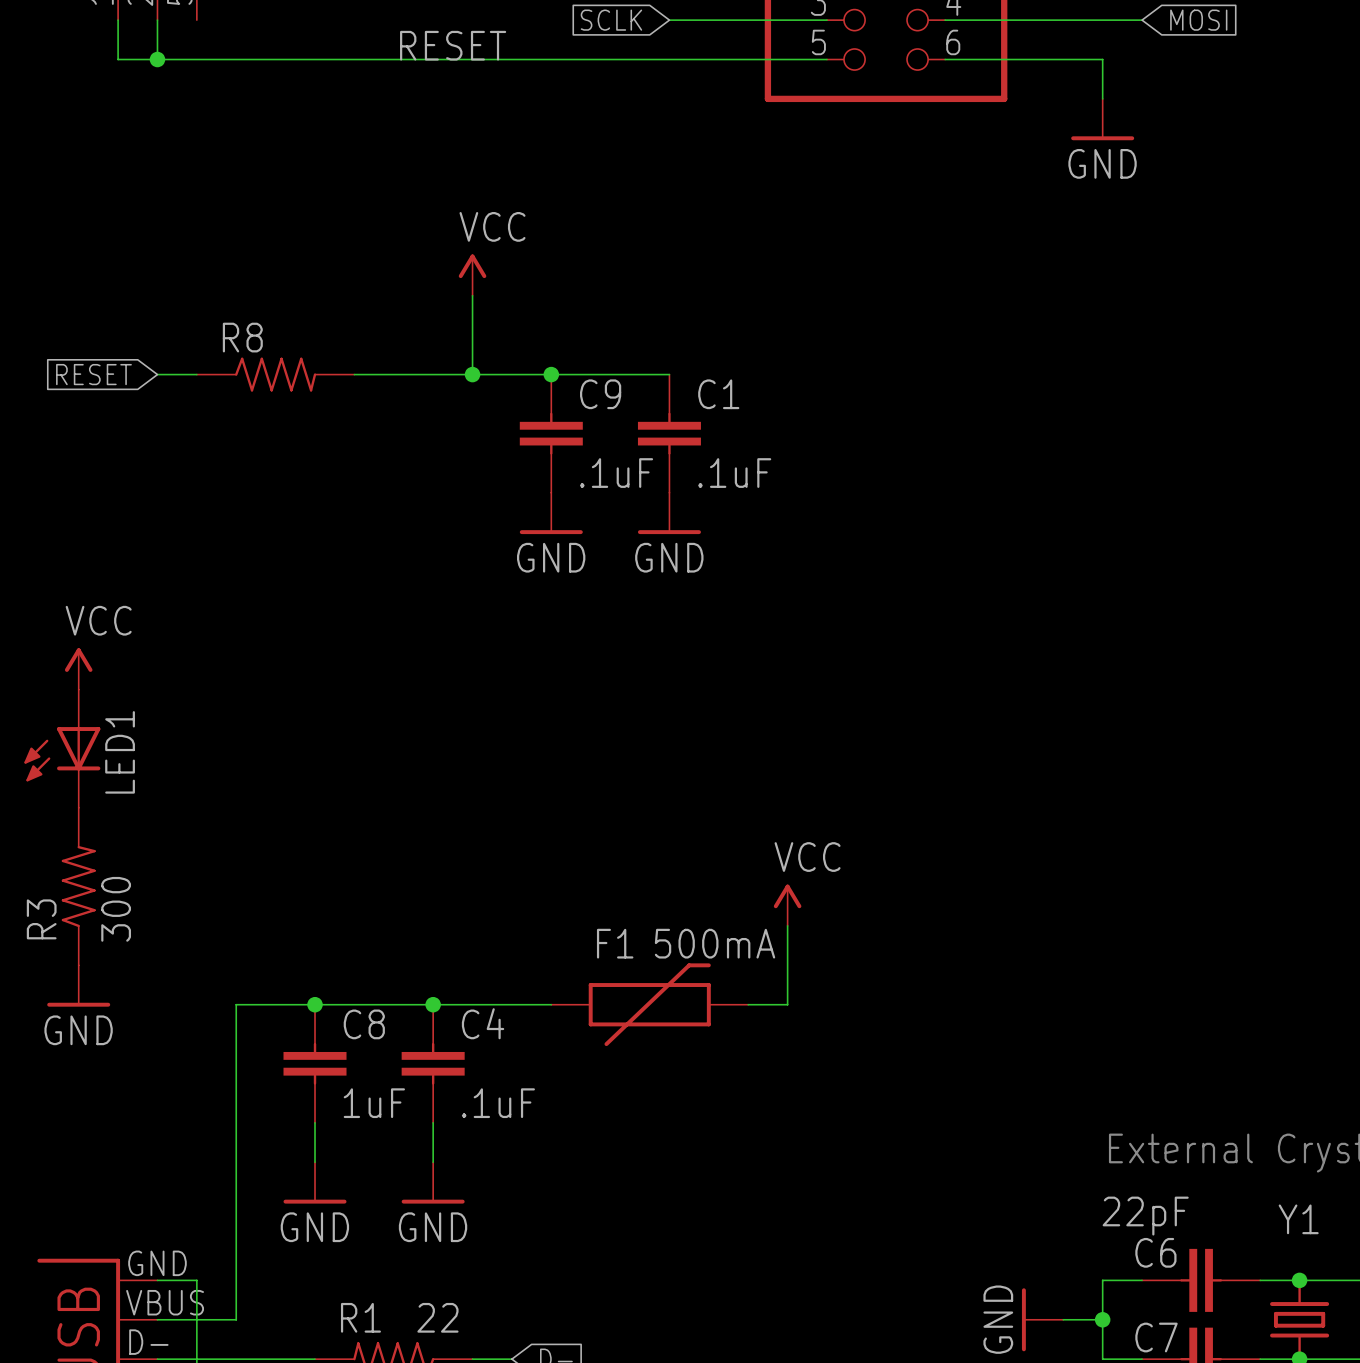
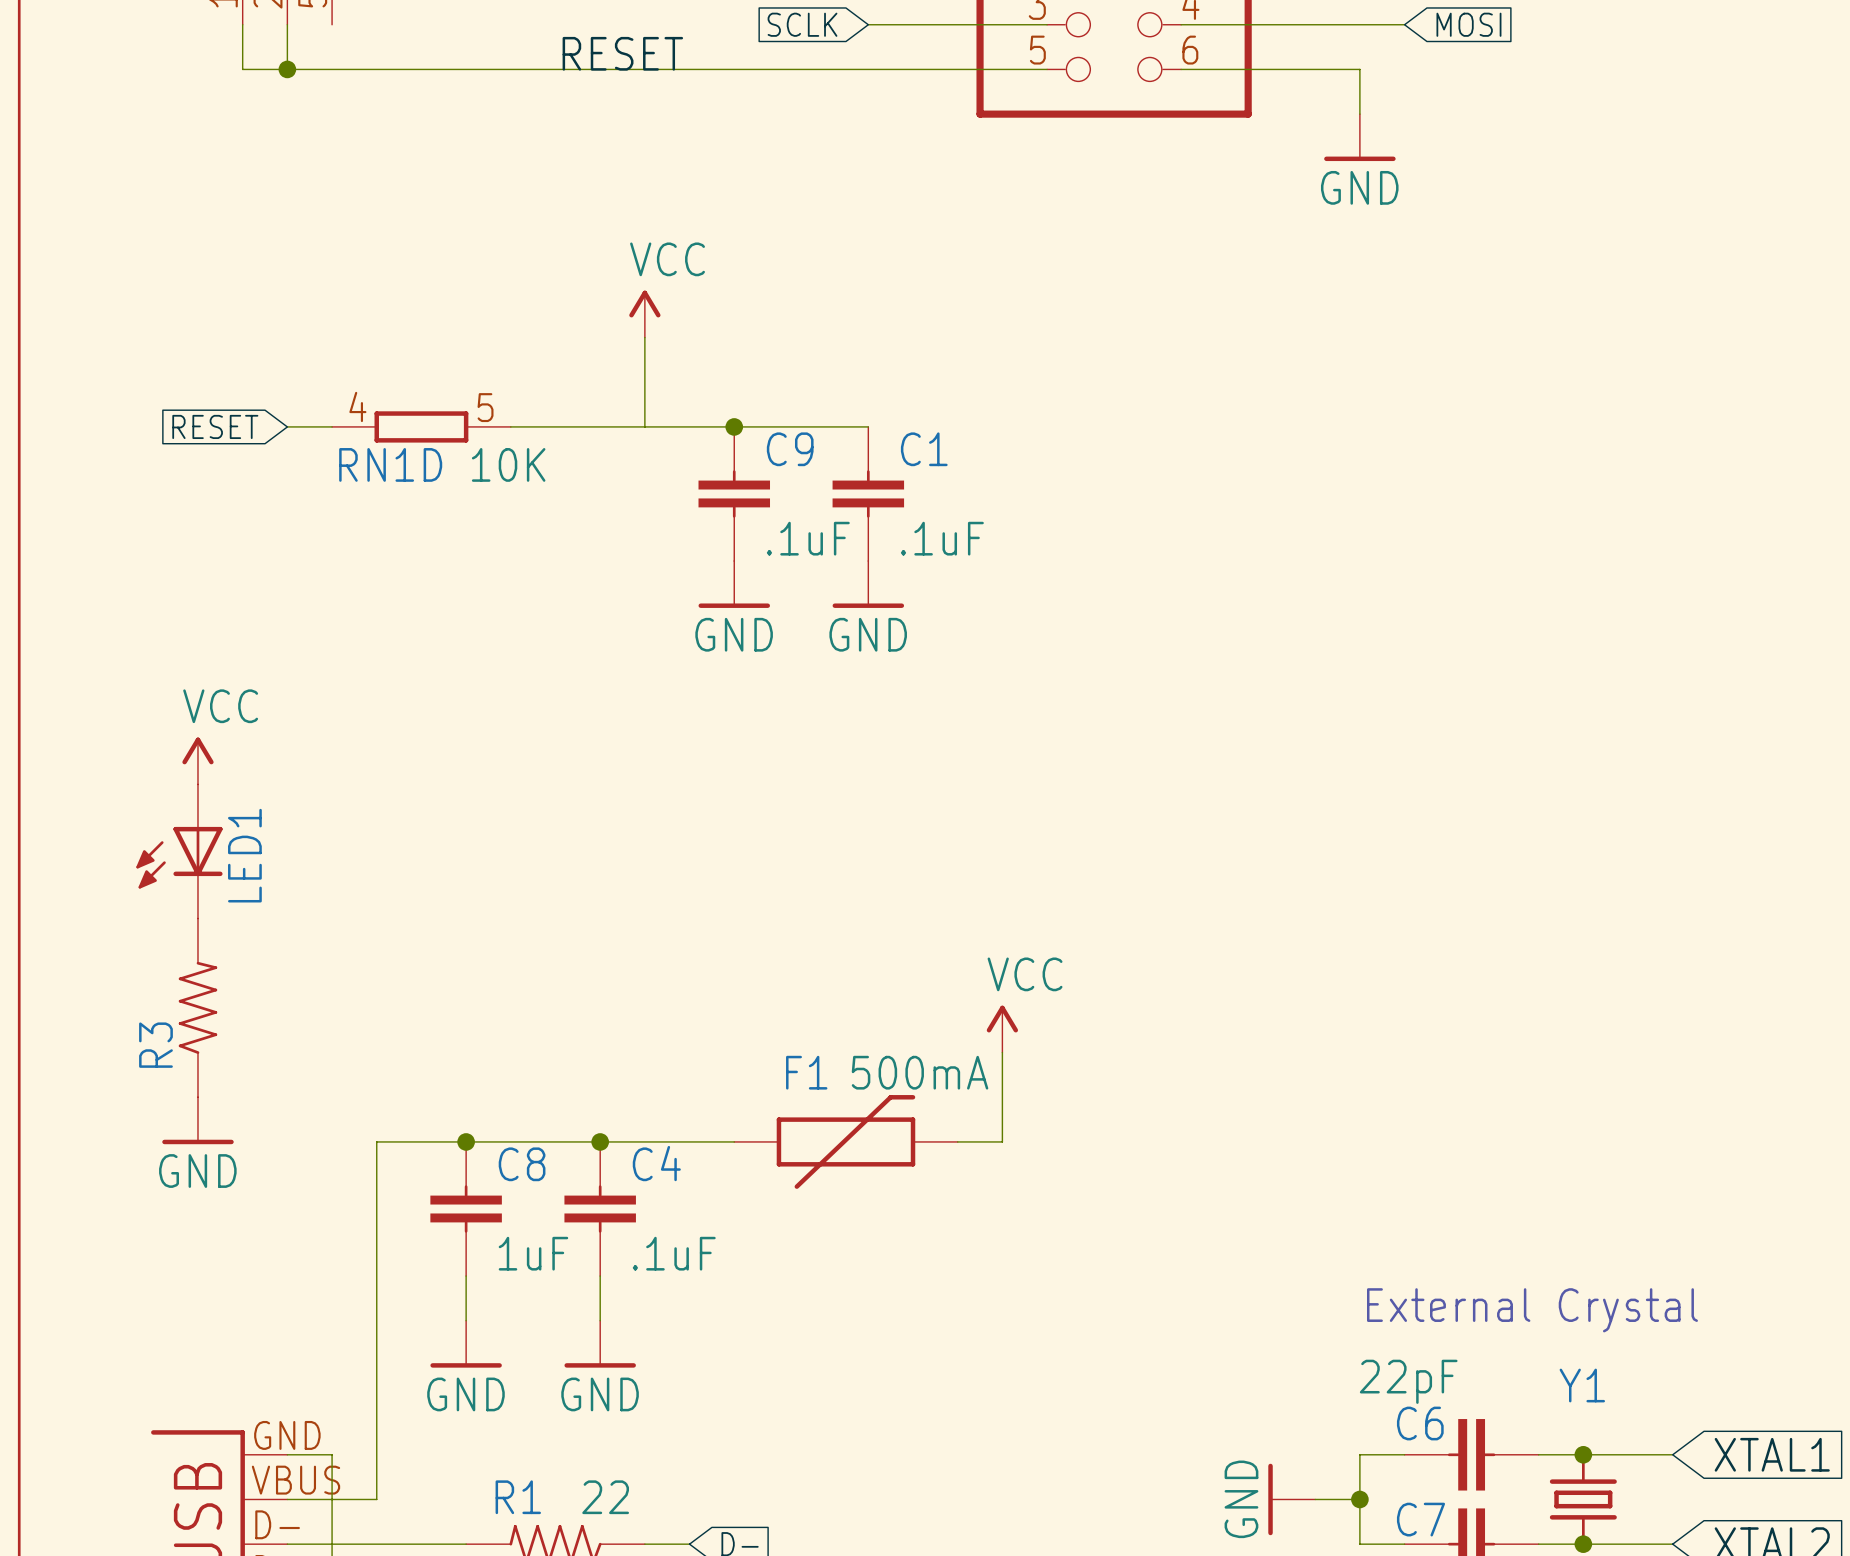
R8: (275, 374) -> none
RN1D: none -> 10K (421, 426)
junction: (472, 374) -> none
R3 value: 300 (116, 909) -> none

